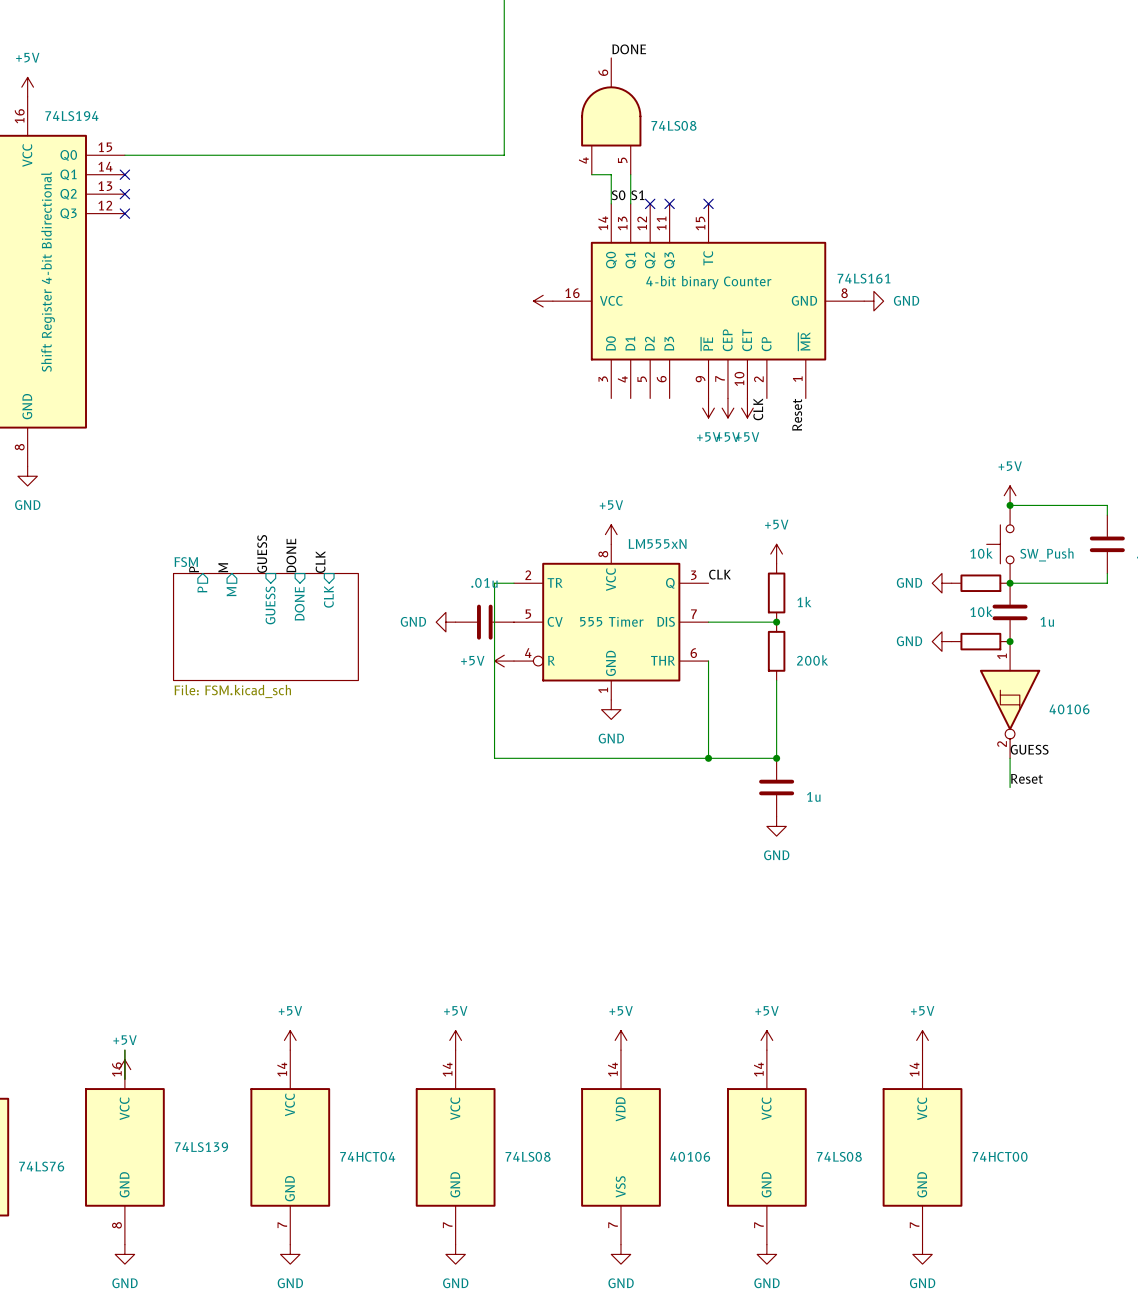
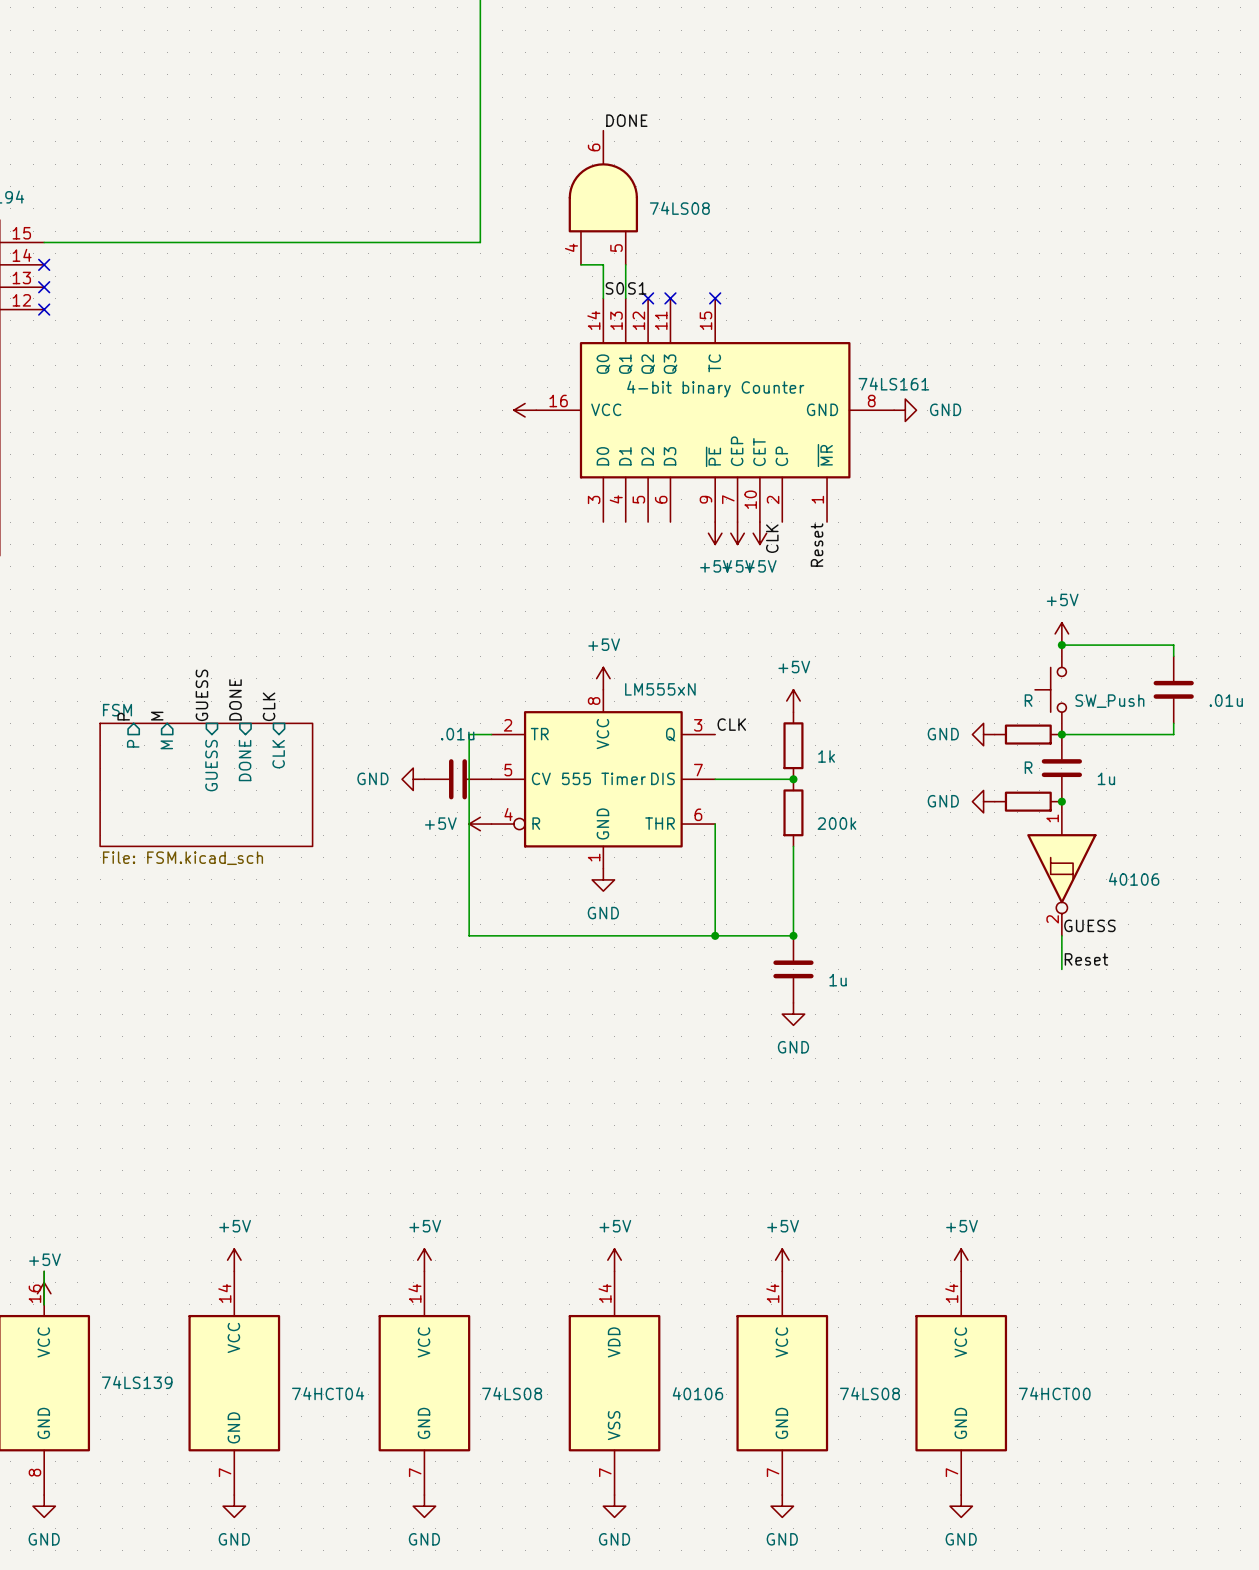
part value: 10k (981, 553) -> R (1028, 700)
part value: 10k (981, 611) -> R (1028, 767)

